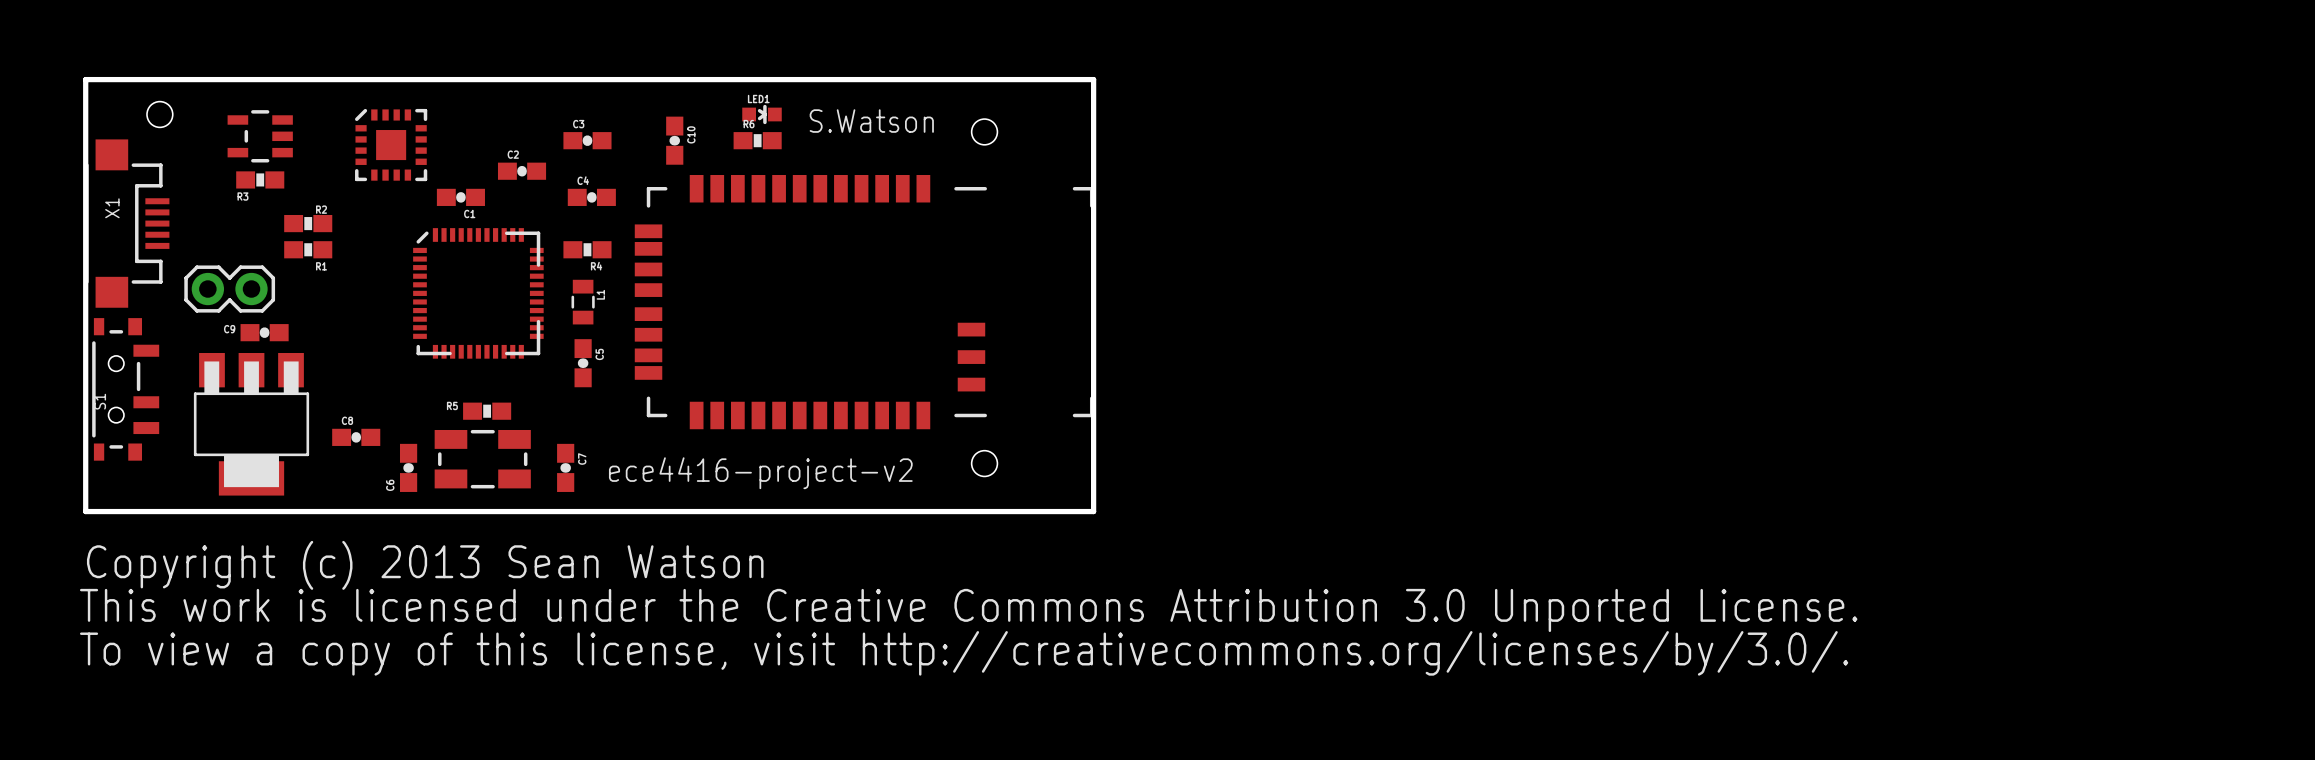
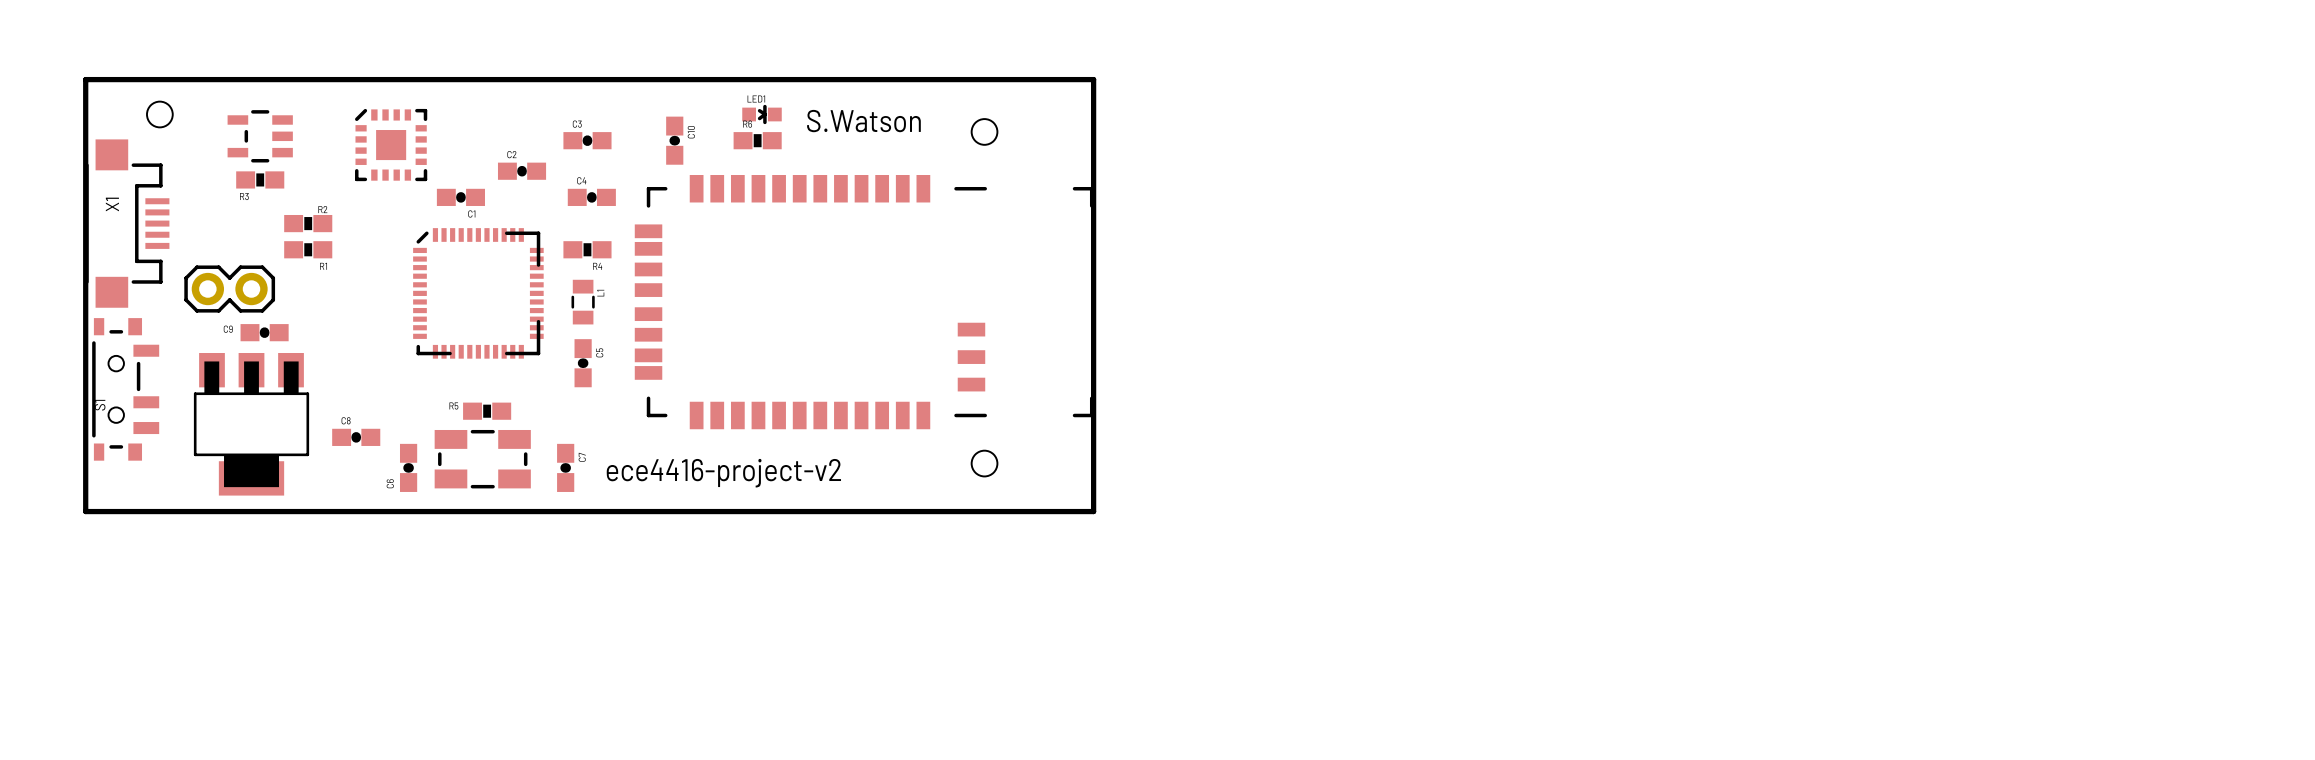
text: Copyright (c) 2013 Sean Watson (425, 565) -> none
text: This work is licensed under the Creative Commons Attribution 3.0 Unported License. (968, 610) -> none
text: To view a copy of this license, visit http://creativecommons.org/licenses/by/3.0/. (964, 653) -> none

